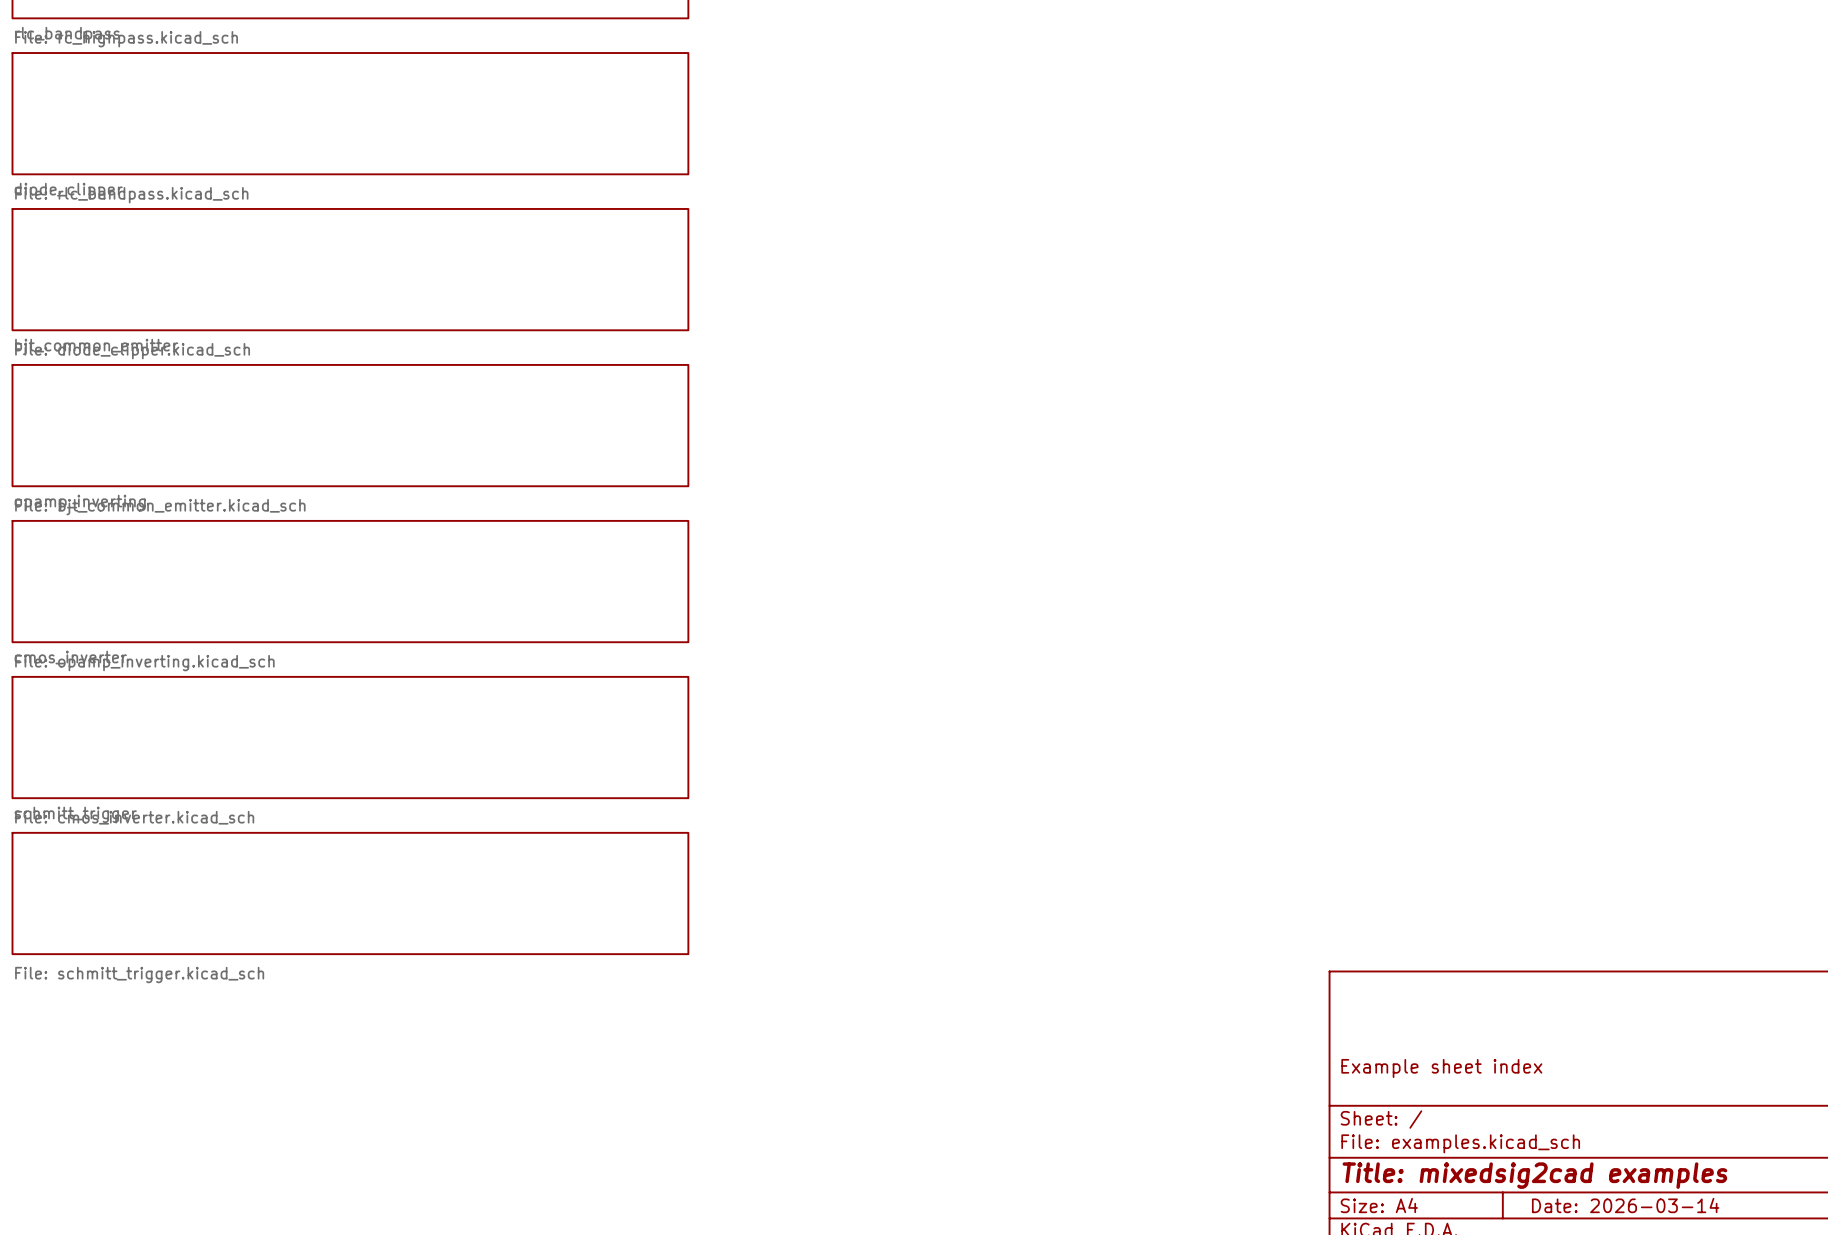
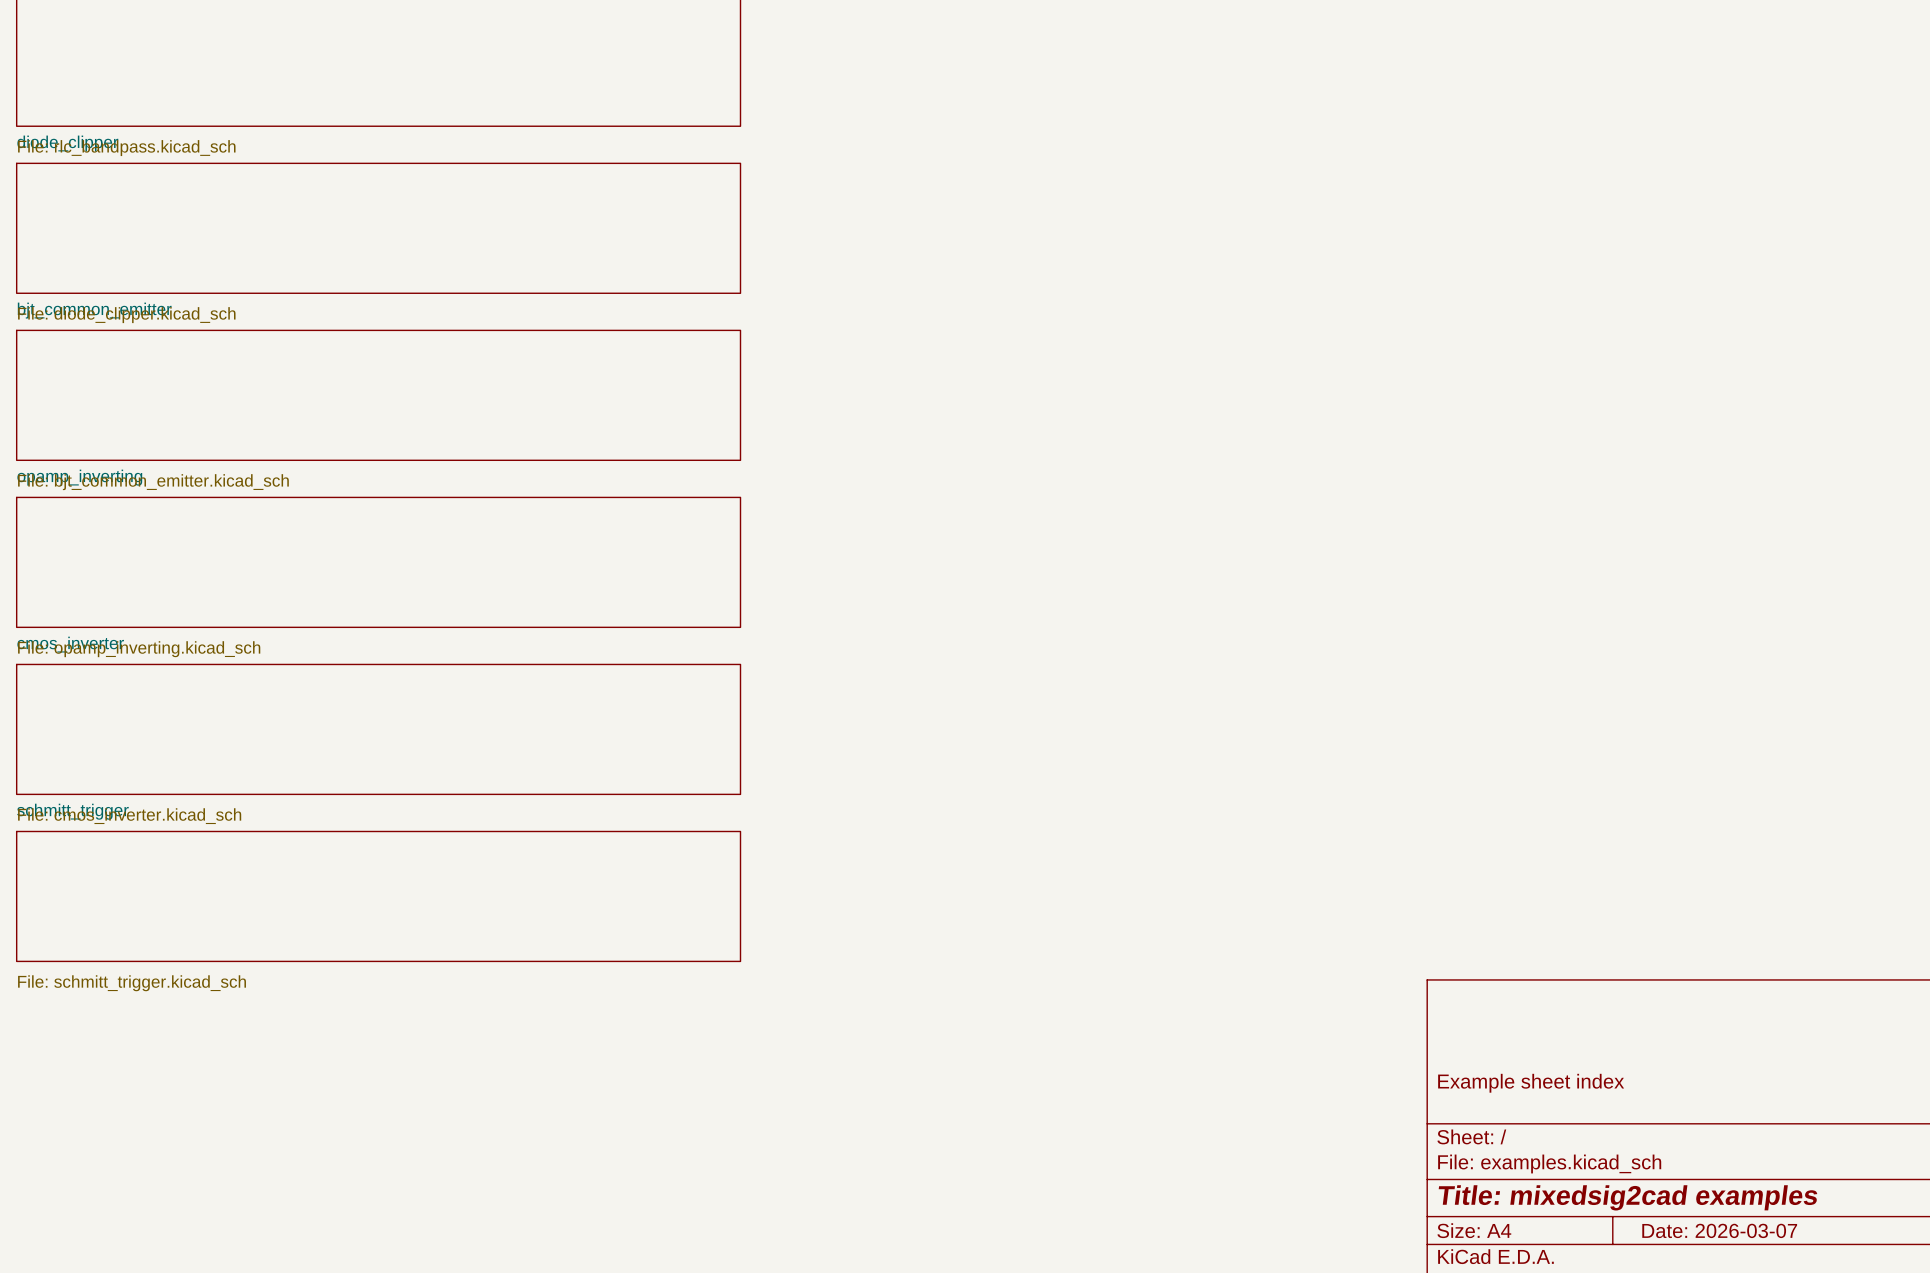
title block: Date: 2026-03-14 (1625, 1205) -> Date: 2026-03-07 (1719, 1230)

